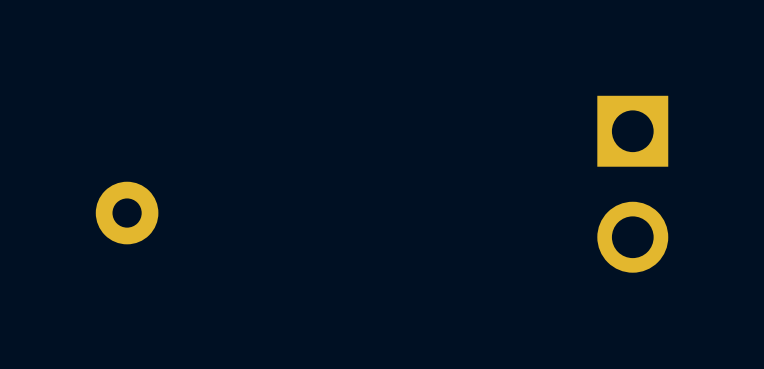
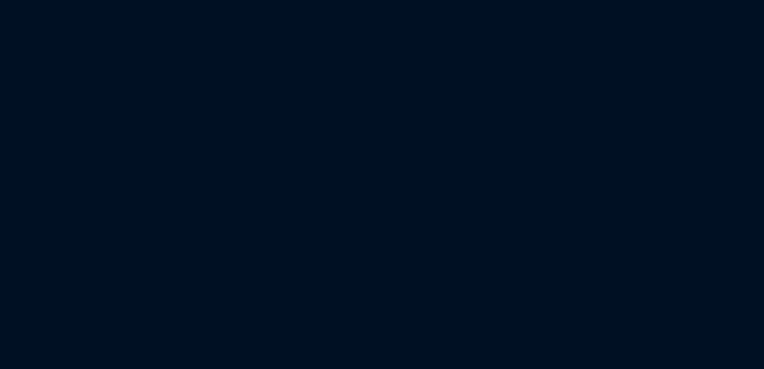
part: (632, 184) -> none
part: (127, 213) -> none

